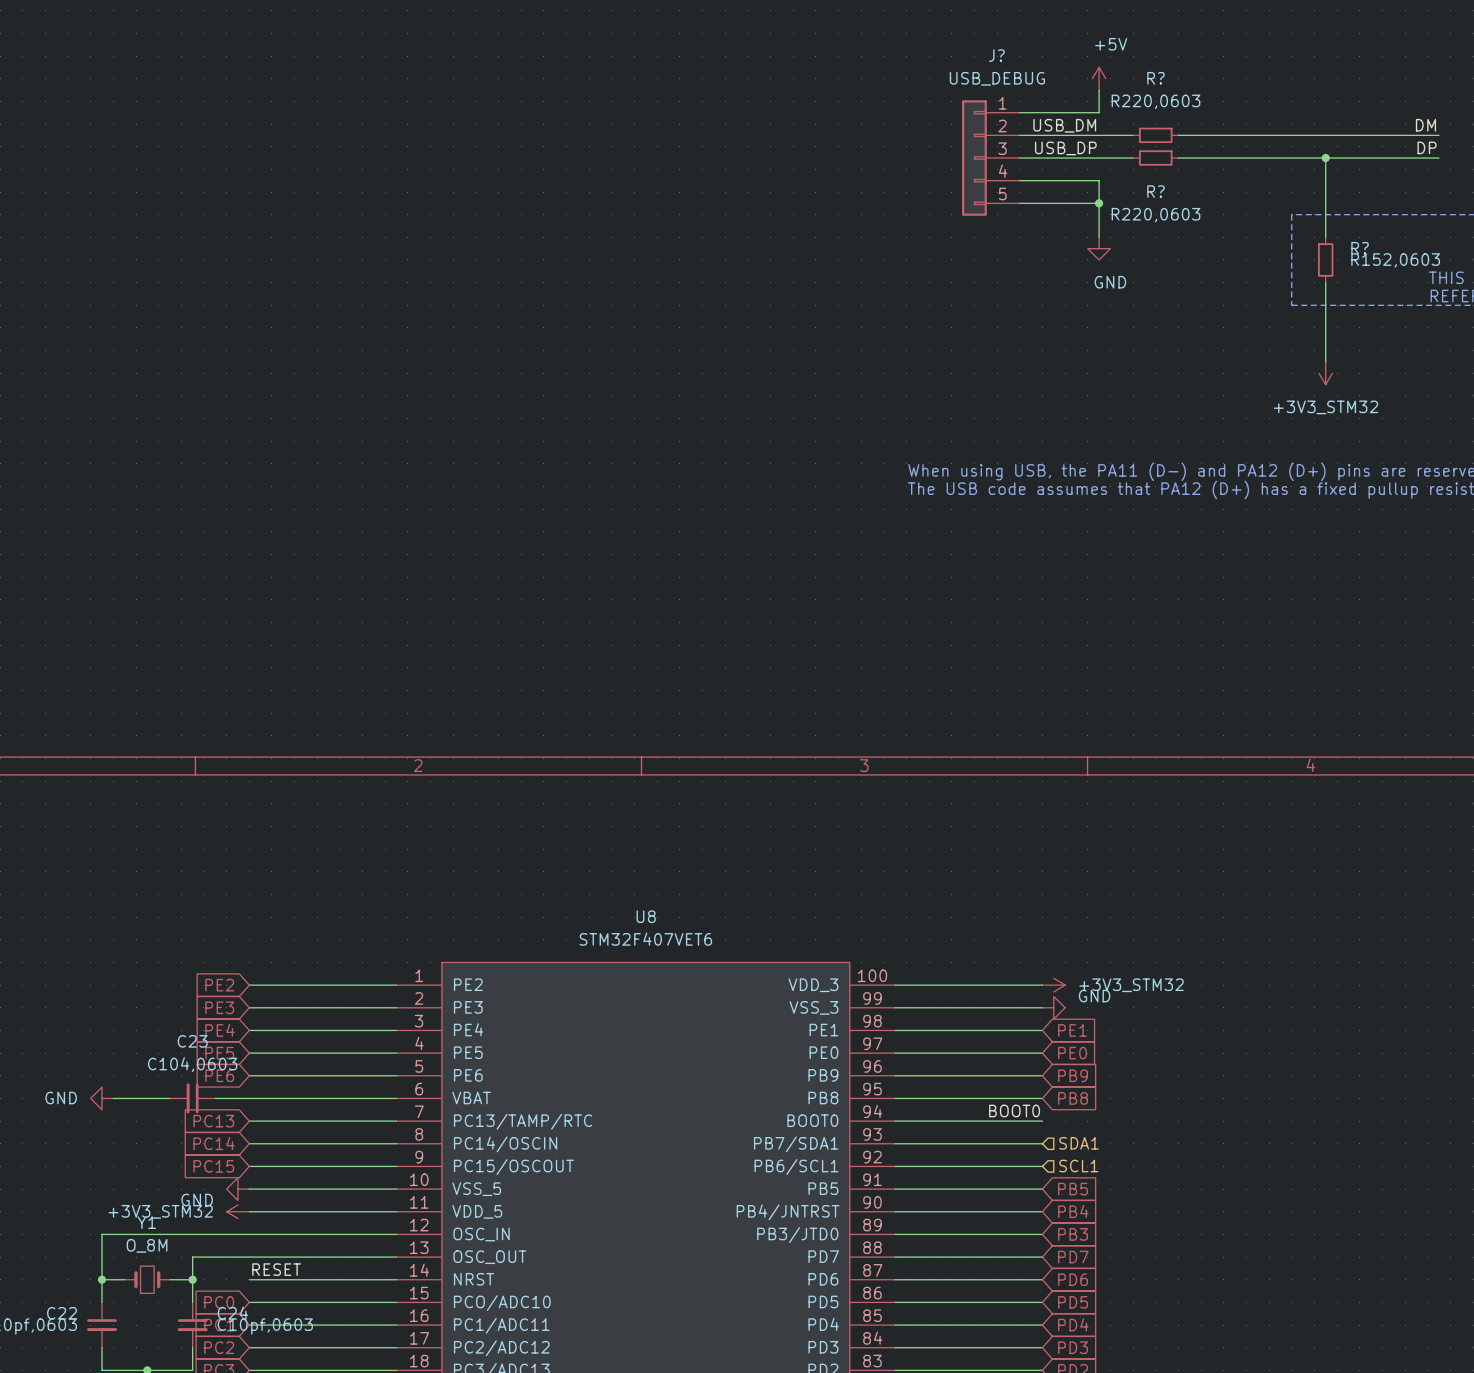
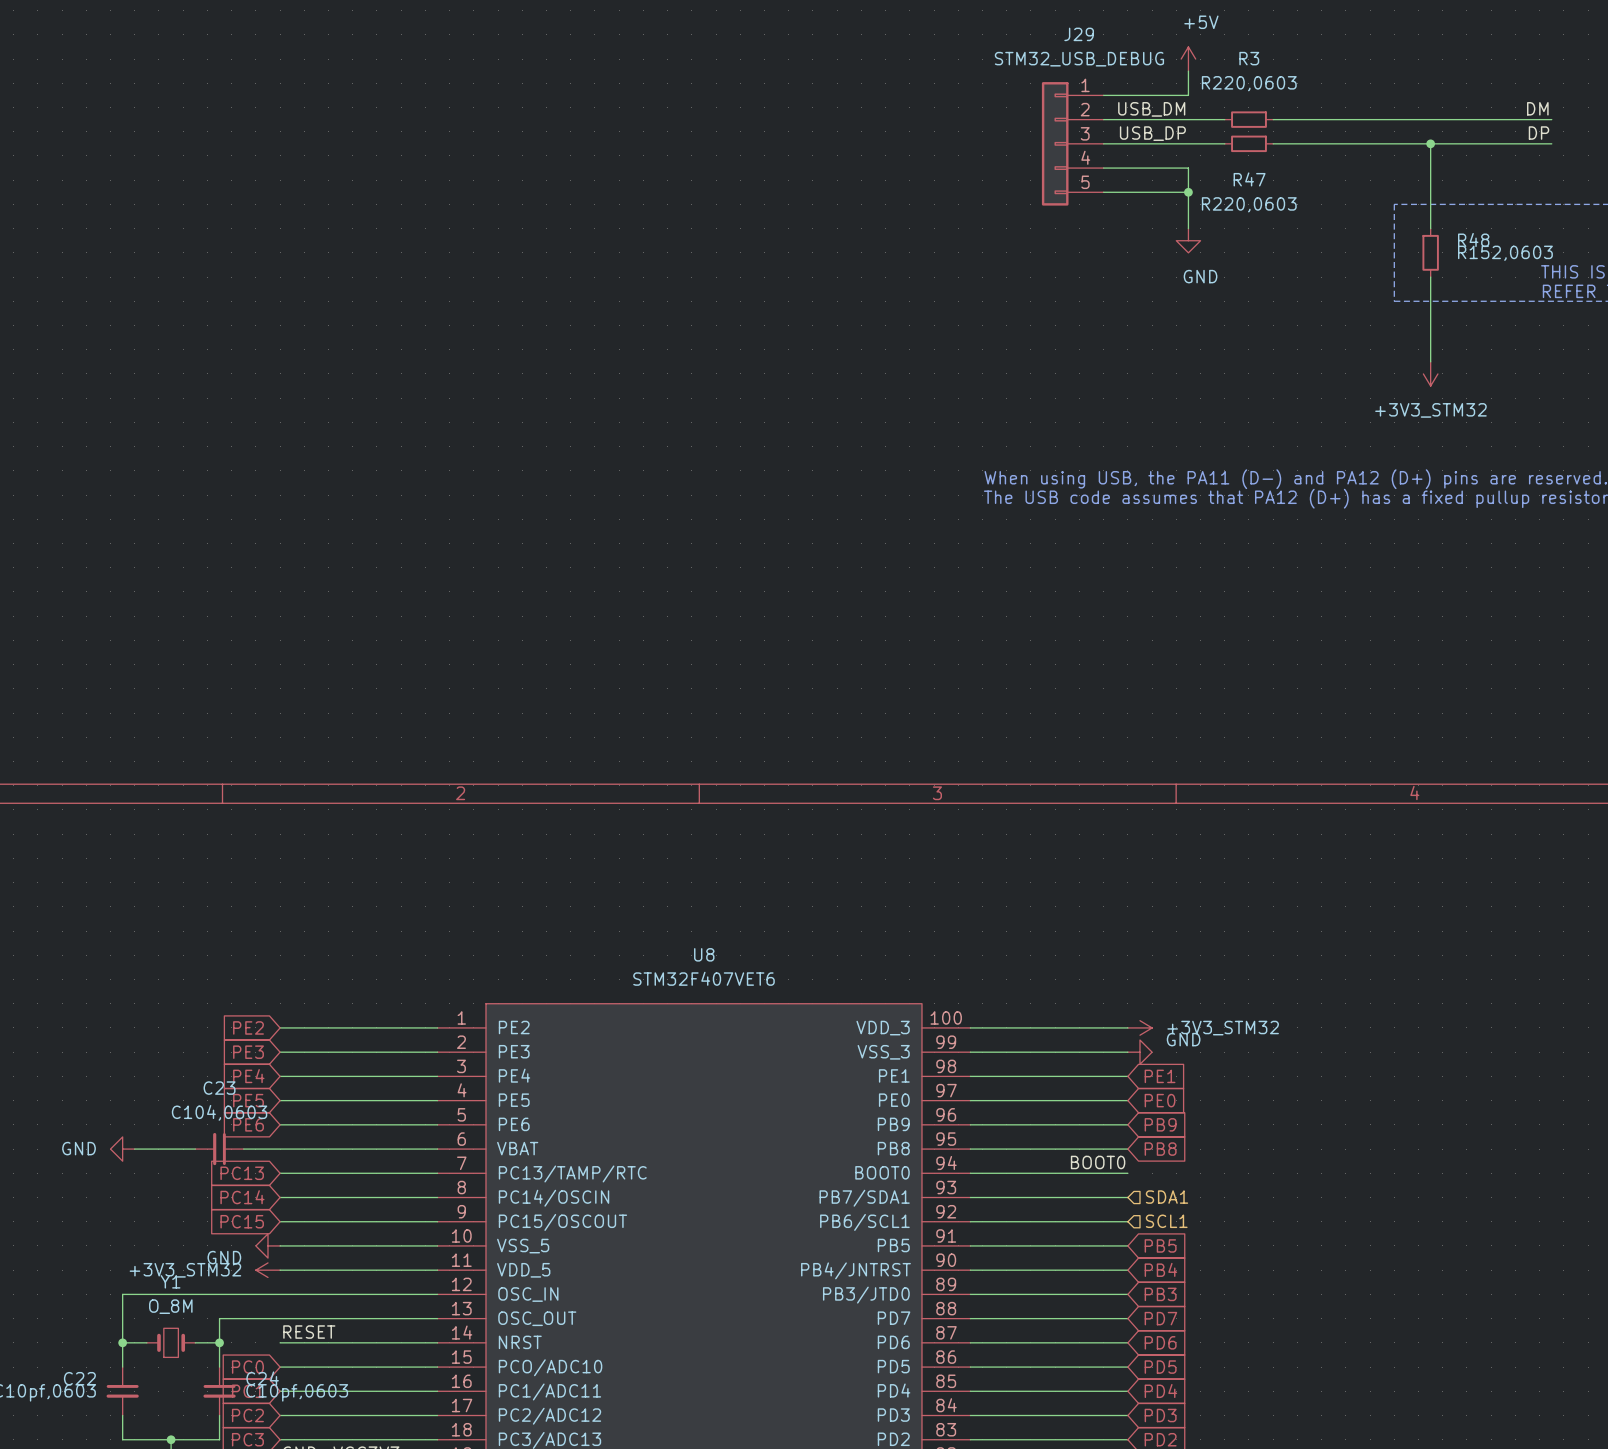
J? name: J? (996, 55) -> J29 (1079, 34)
J? value: USB_DEBUG (997, 78) -> STM32_USB_DEBUG (1079, 59)
R? name: R? (1156, 78) -> R3 (1249, 58)
R? name: R? (1156, 191) -> R47 (1249, 179)
R? name: R? (1360, 248) -> R48 (1473, 239)

